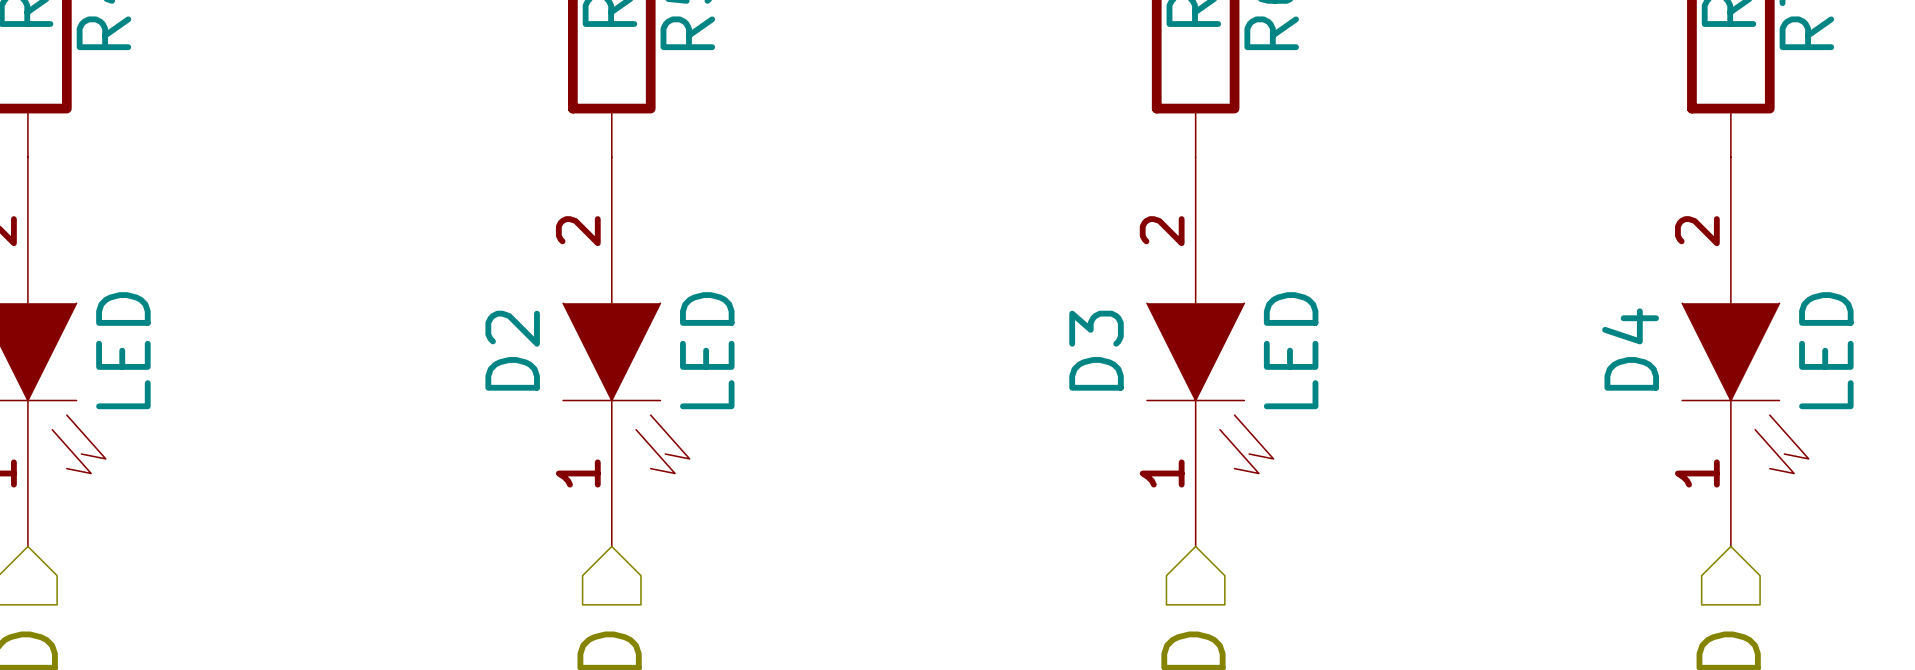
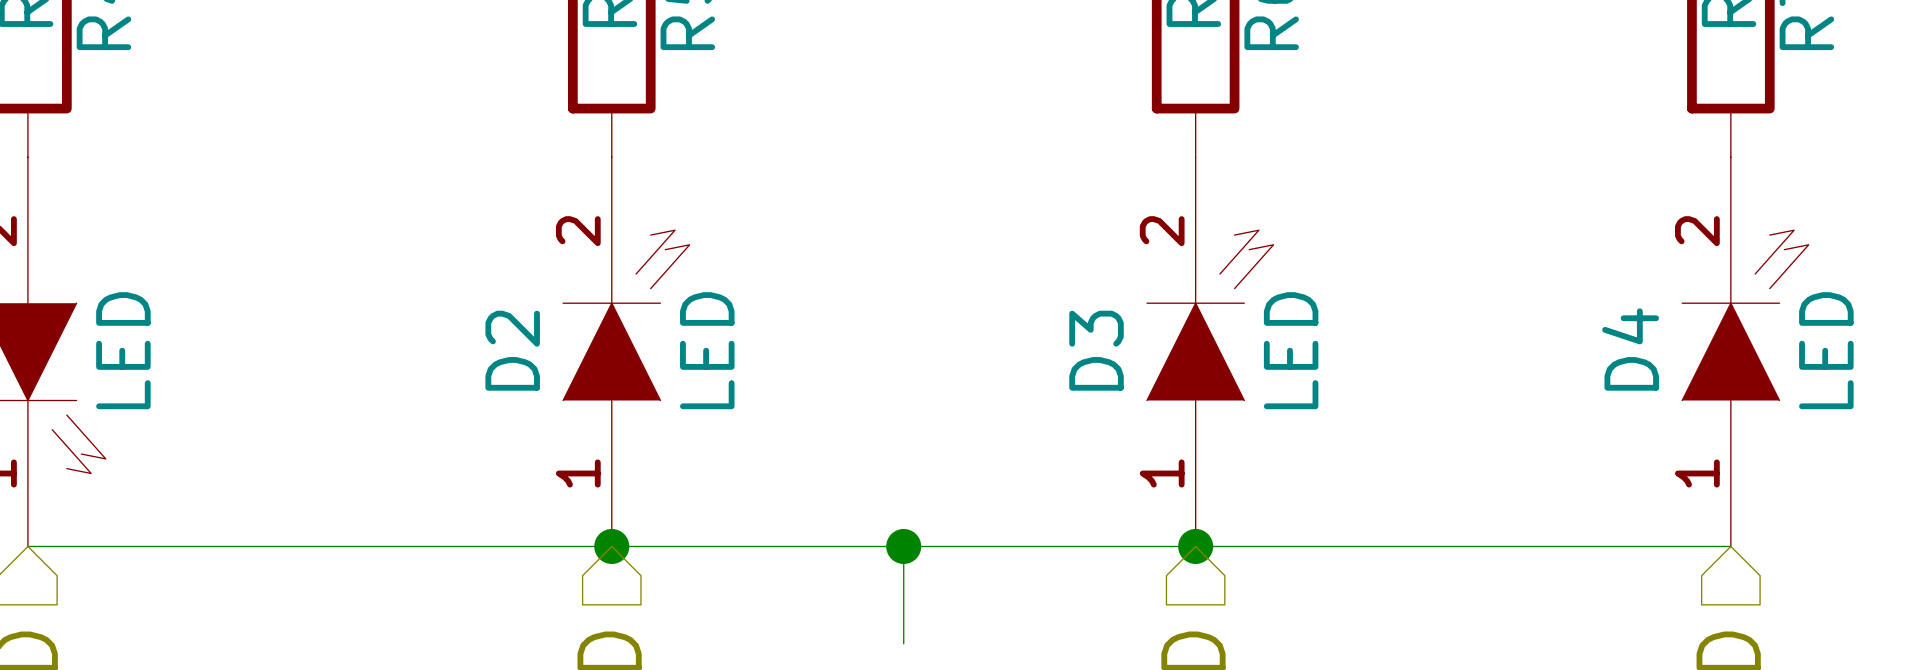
D2 symbol: [563, 157, 690, 547] -> [563, 157, 690, 547]
D3 symbol: [1146, 157, 1274, 547] -> [1146, 157, 1274, 547]
D4 symbol: [1682, 157, 1809, 547] -> [1682, 157, 1809, 547]
wire: none -> (27, 546) (1730, 546)
junction: none -> (611, 546)
wire: none -> (903, 546) (903, 643)
junction: none -> (903, 546)
junction: none -> (1195, 546)

